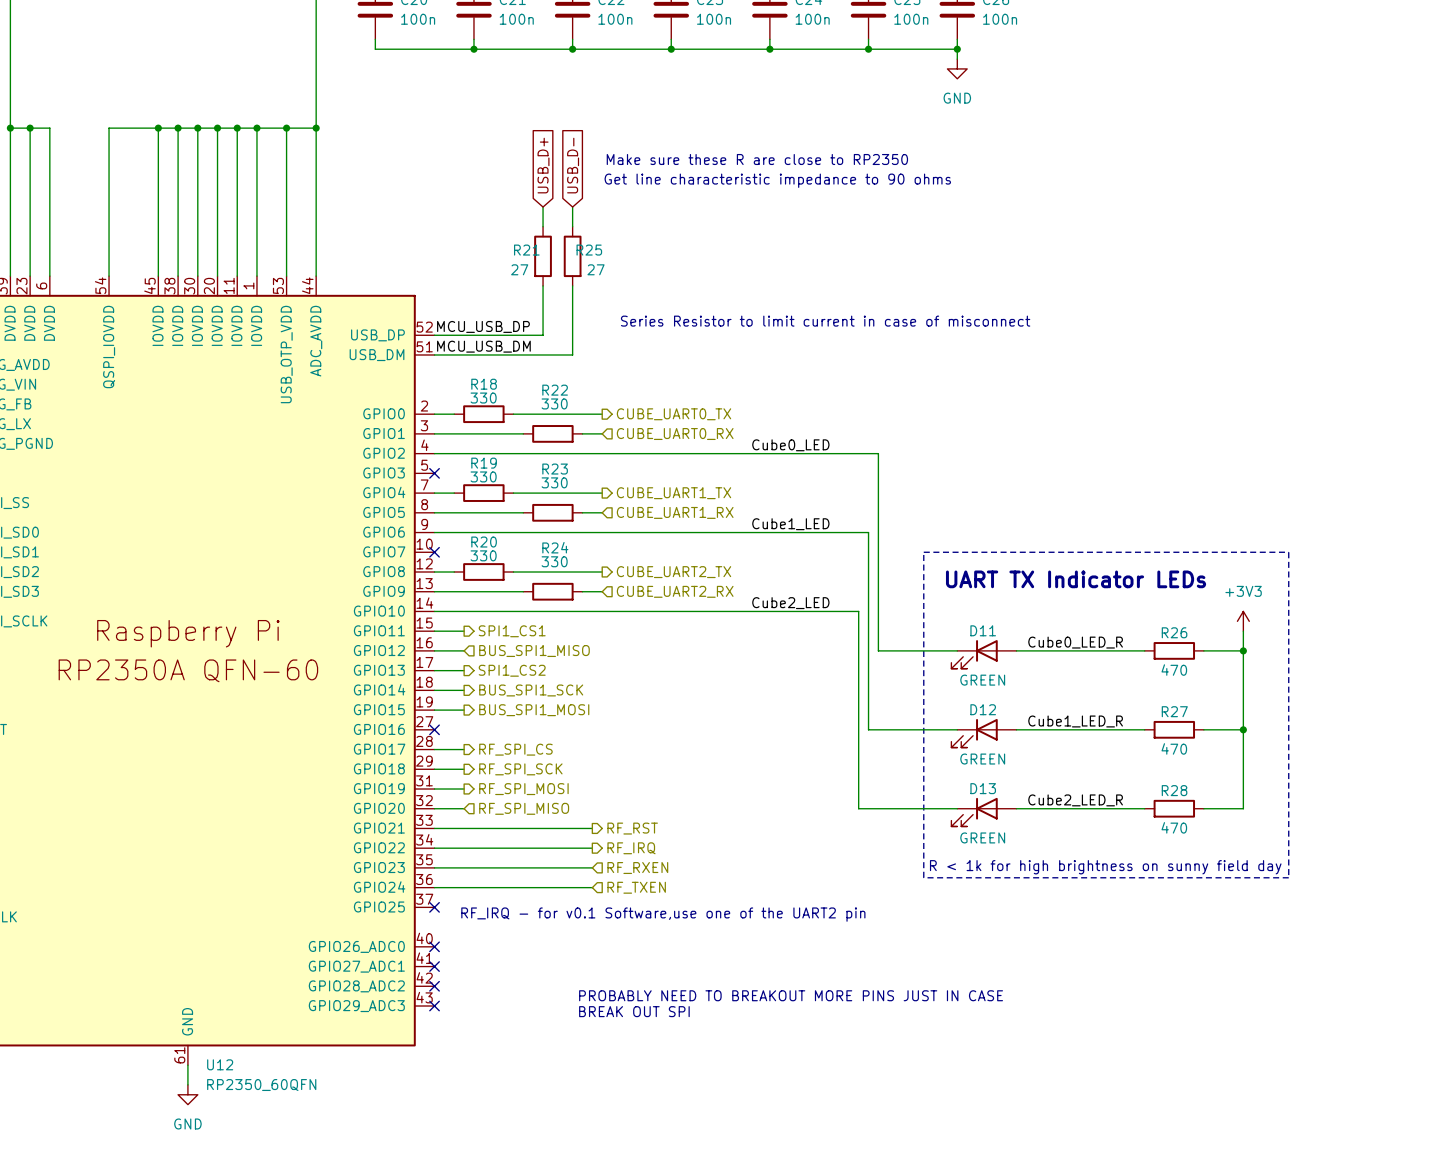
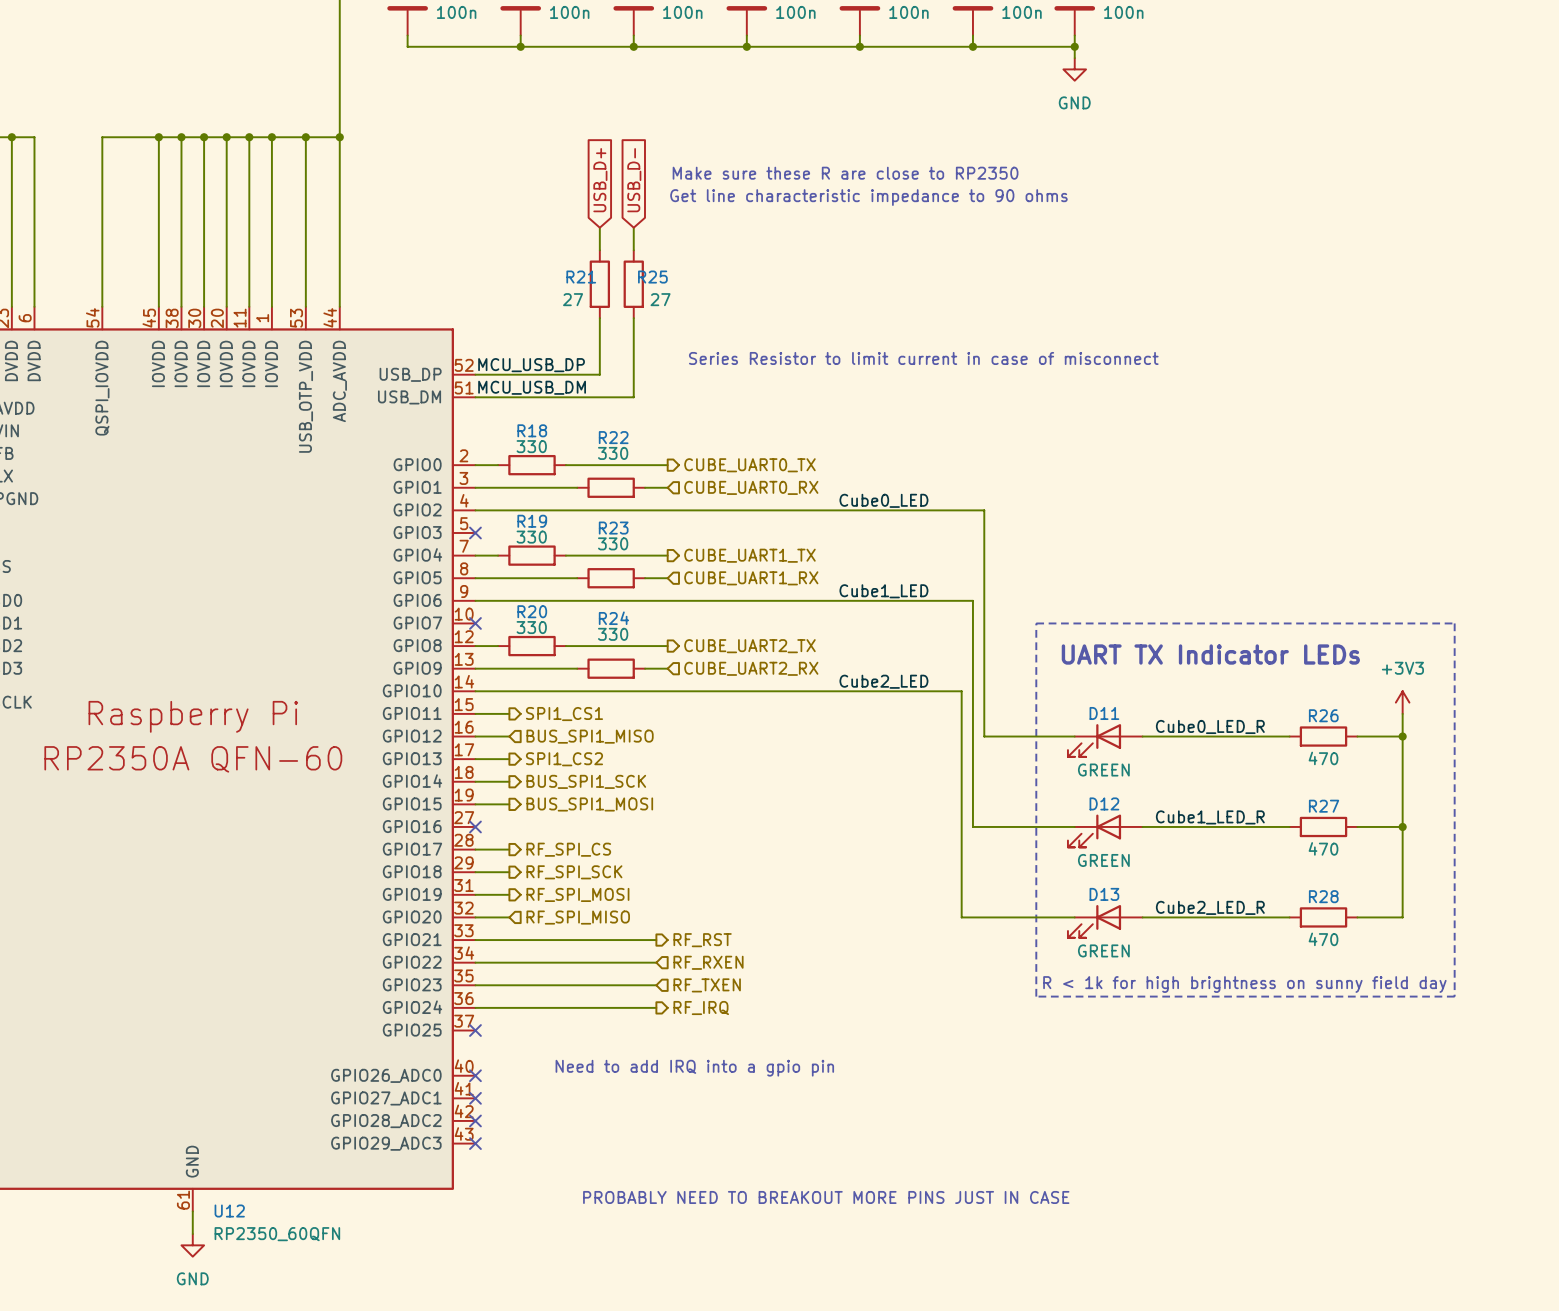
hierarchical label shape: output (631, 848) -> input (708, 962)
hierarchical label: RF_IRQ (631, 848) -> RF_RXEN (708, 962)
hierarchical label: RF_RXEN (637, 868) -> RF_TXEN (707, 985)
hierarchical label shape: input (636, 887) -> output (701, 1008)
hierarchical label: RF_TXEN (636, 887) -> RF_IRQ (701, 1008)
text: RF_IRQ - for v0.1 Software,use one of the UART2 pin (663, 914) -> none
text: none -> Need to add IRQ into a gpio pin (694, 1068)
text position: PROBABLY NEED TO BREAKOUT MORE PINS JUST IN CASE (791, 995) -> PROBABLY NEED TO BREAKOUT MORE PINS JUST IN CASE (826, 1197)
text: BREAK OUT SPI (634, 1011) -> none

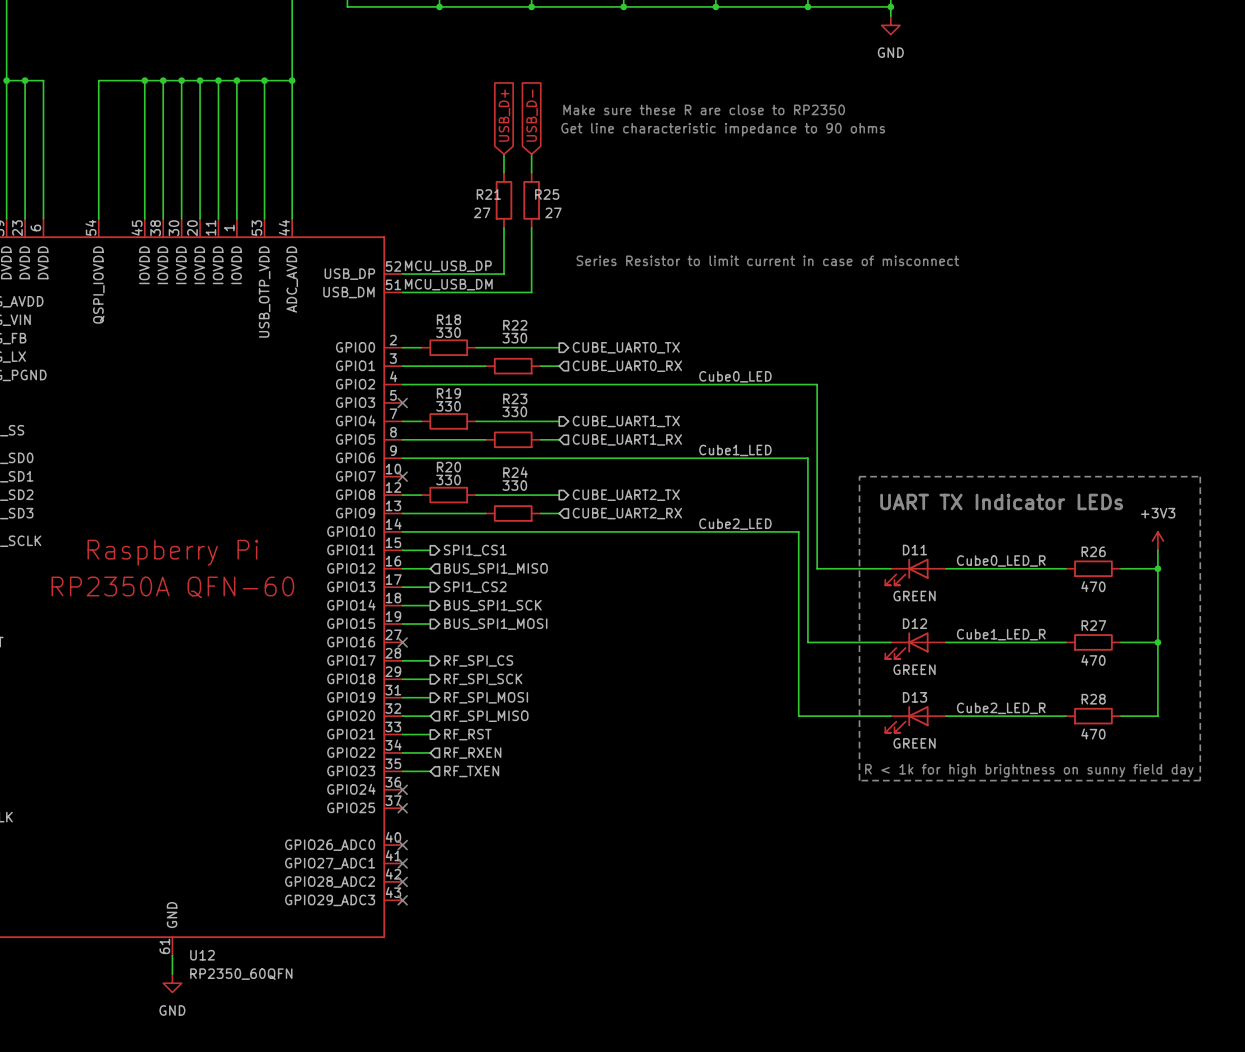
wire: (509, 940) (656, 940) -> none
hierarchical label position: RF_RST (702, 940) -> RF_RST (467, 734)
wire: (509, 962) (656, 962) -> none
hierarchical label position: RF_RXEN (708, 962) -> RF_RXEN (472, 753)
wire: (509, 985) (656, 985) -> none
hierarchical label position: RF_TXEN (707, 985) -> RF_TXEN (471, 771)
wire: (475, 1007) (656, 1007) -> none
no-connect mark: none -> (402, 789)
hierarchical label: RF_IRQ (701, 1008) -> none
text: Need to add IRQ into a gpio pin (694, 1068) -> none
text: PROBABLY NEED TO BREAKOUT MORE PINS JUST IN CASE (826, 1197) -> none

